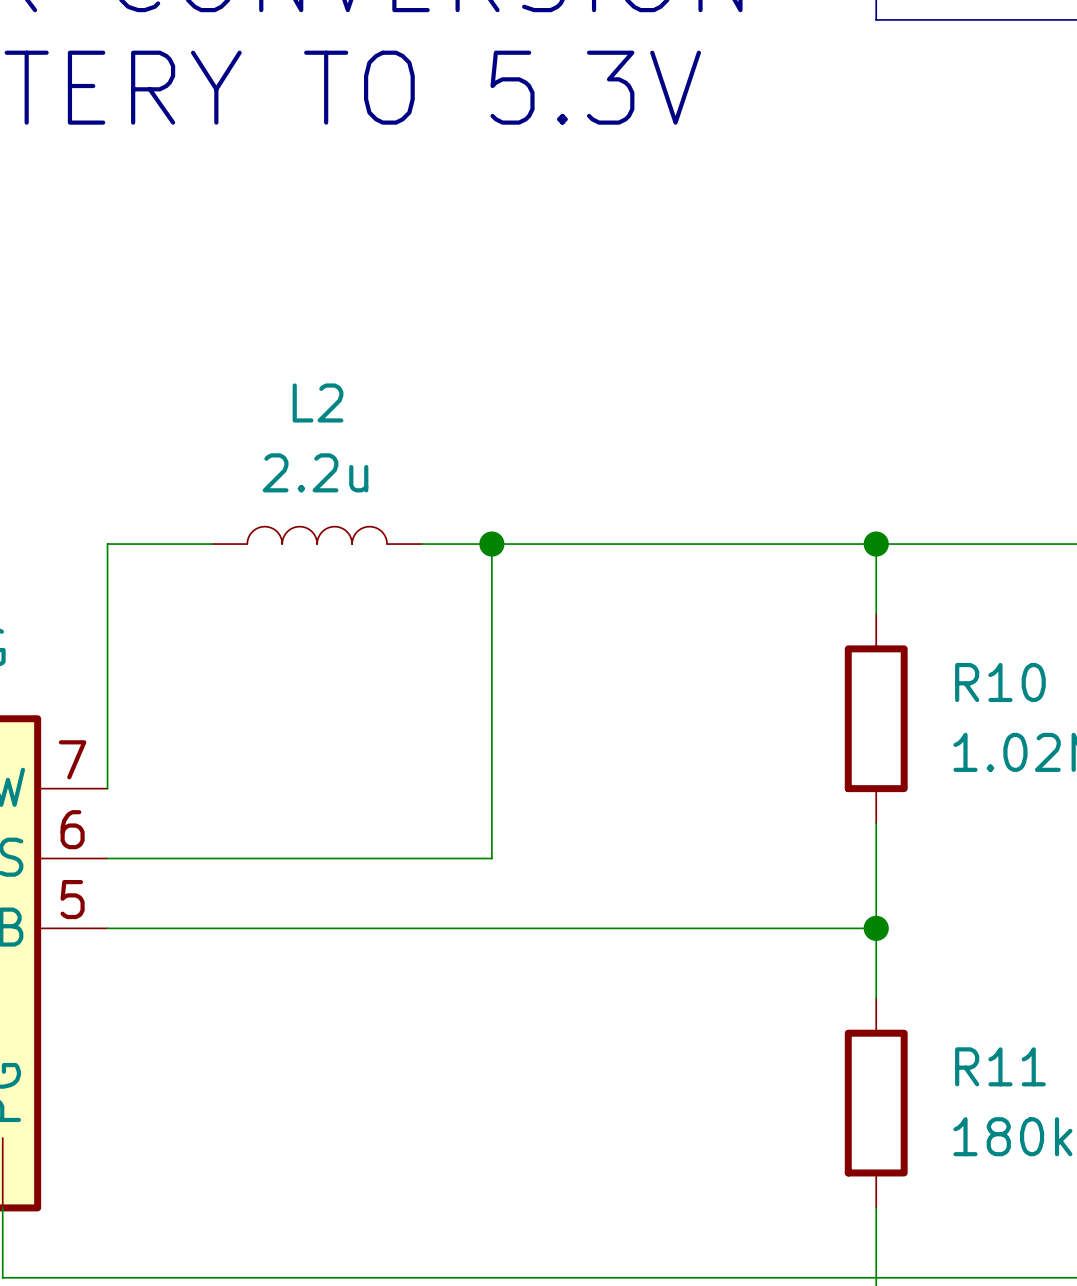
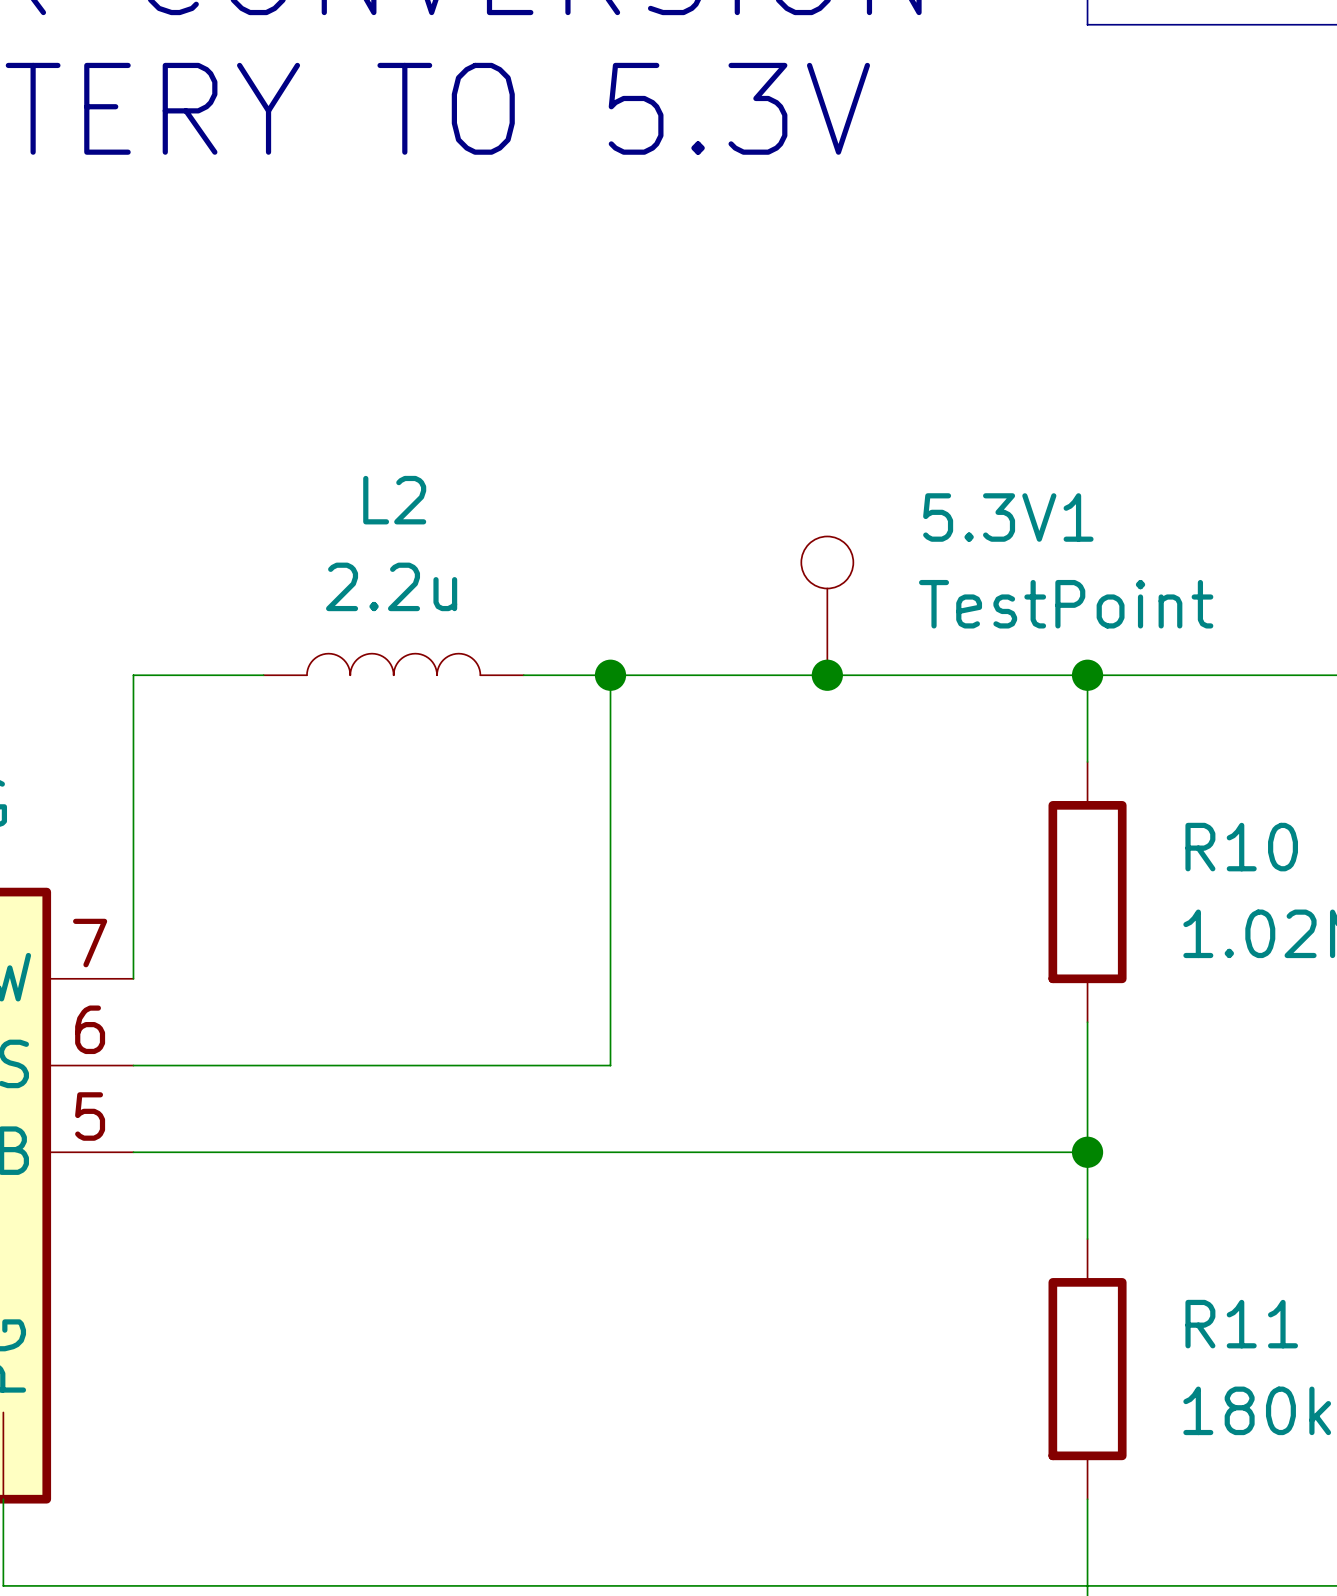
5.3V1: none -> TestPoint (827, 605)
junction: none -> (827, 675)

